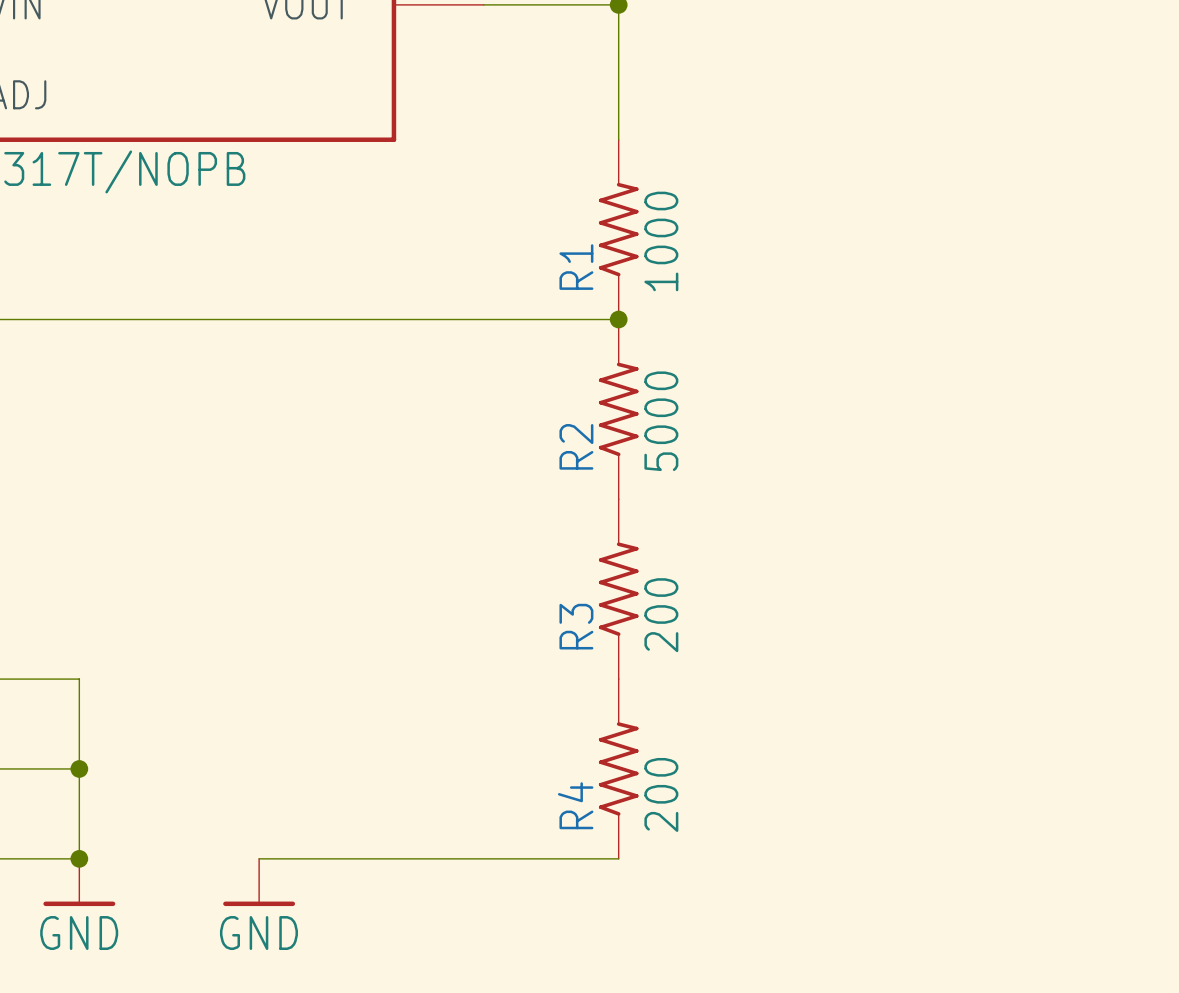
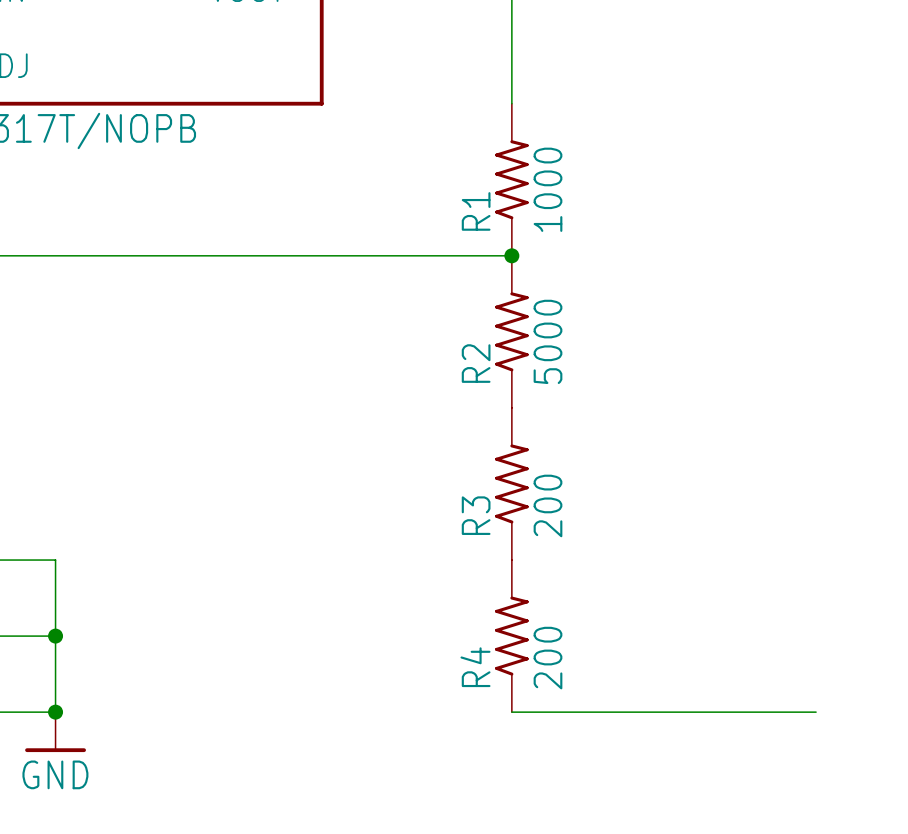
wire: (259, 858) (618, 858) -> (816, 712) (511, 712)
power symbol: GND (259, 882) -> none

